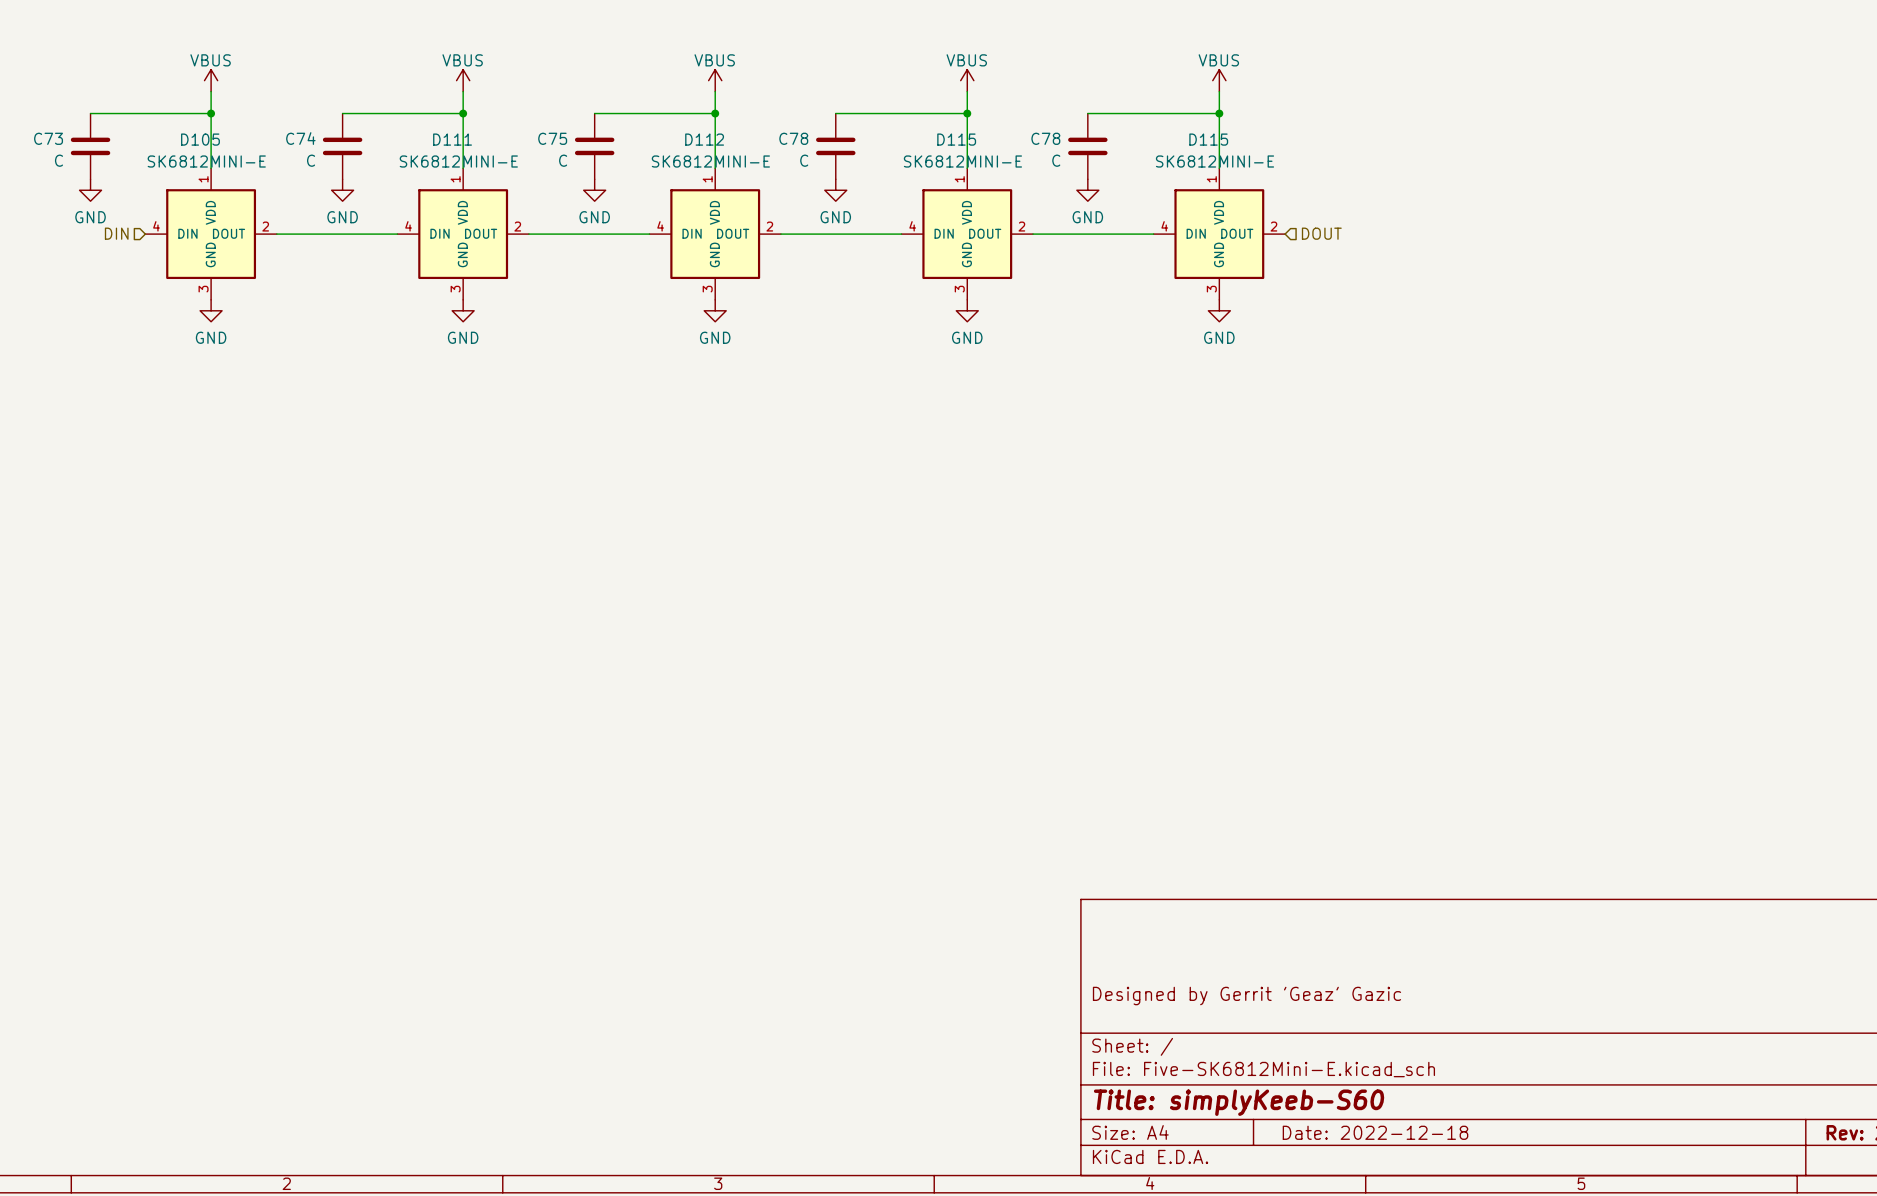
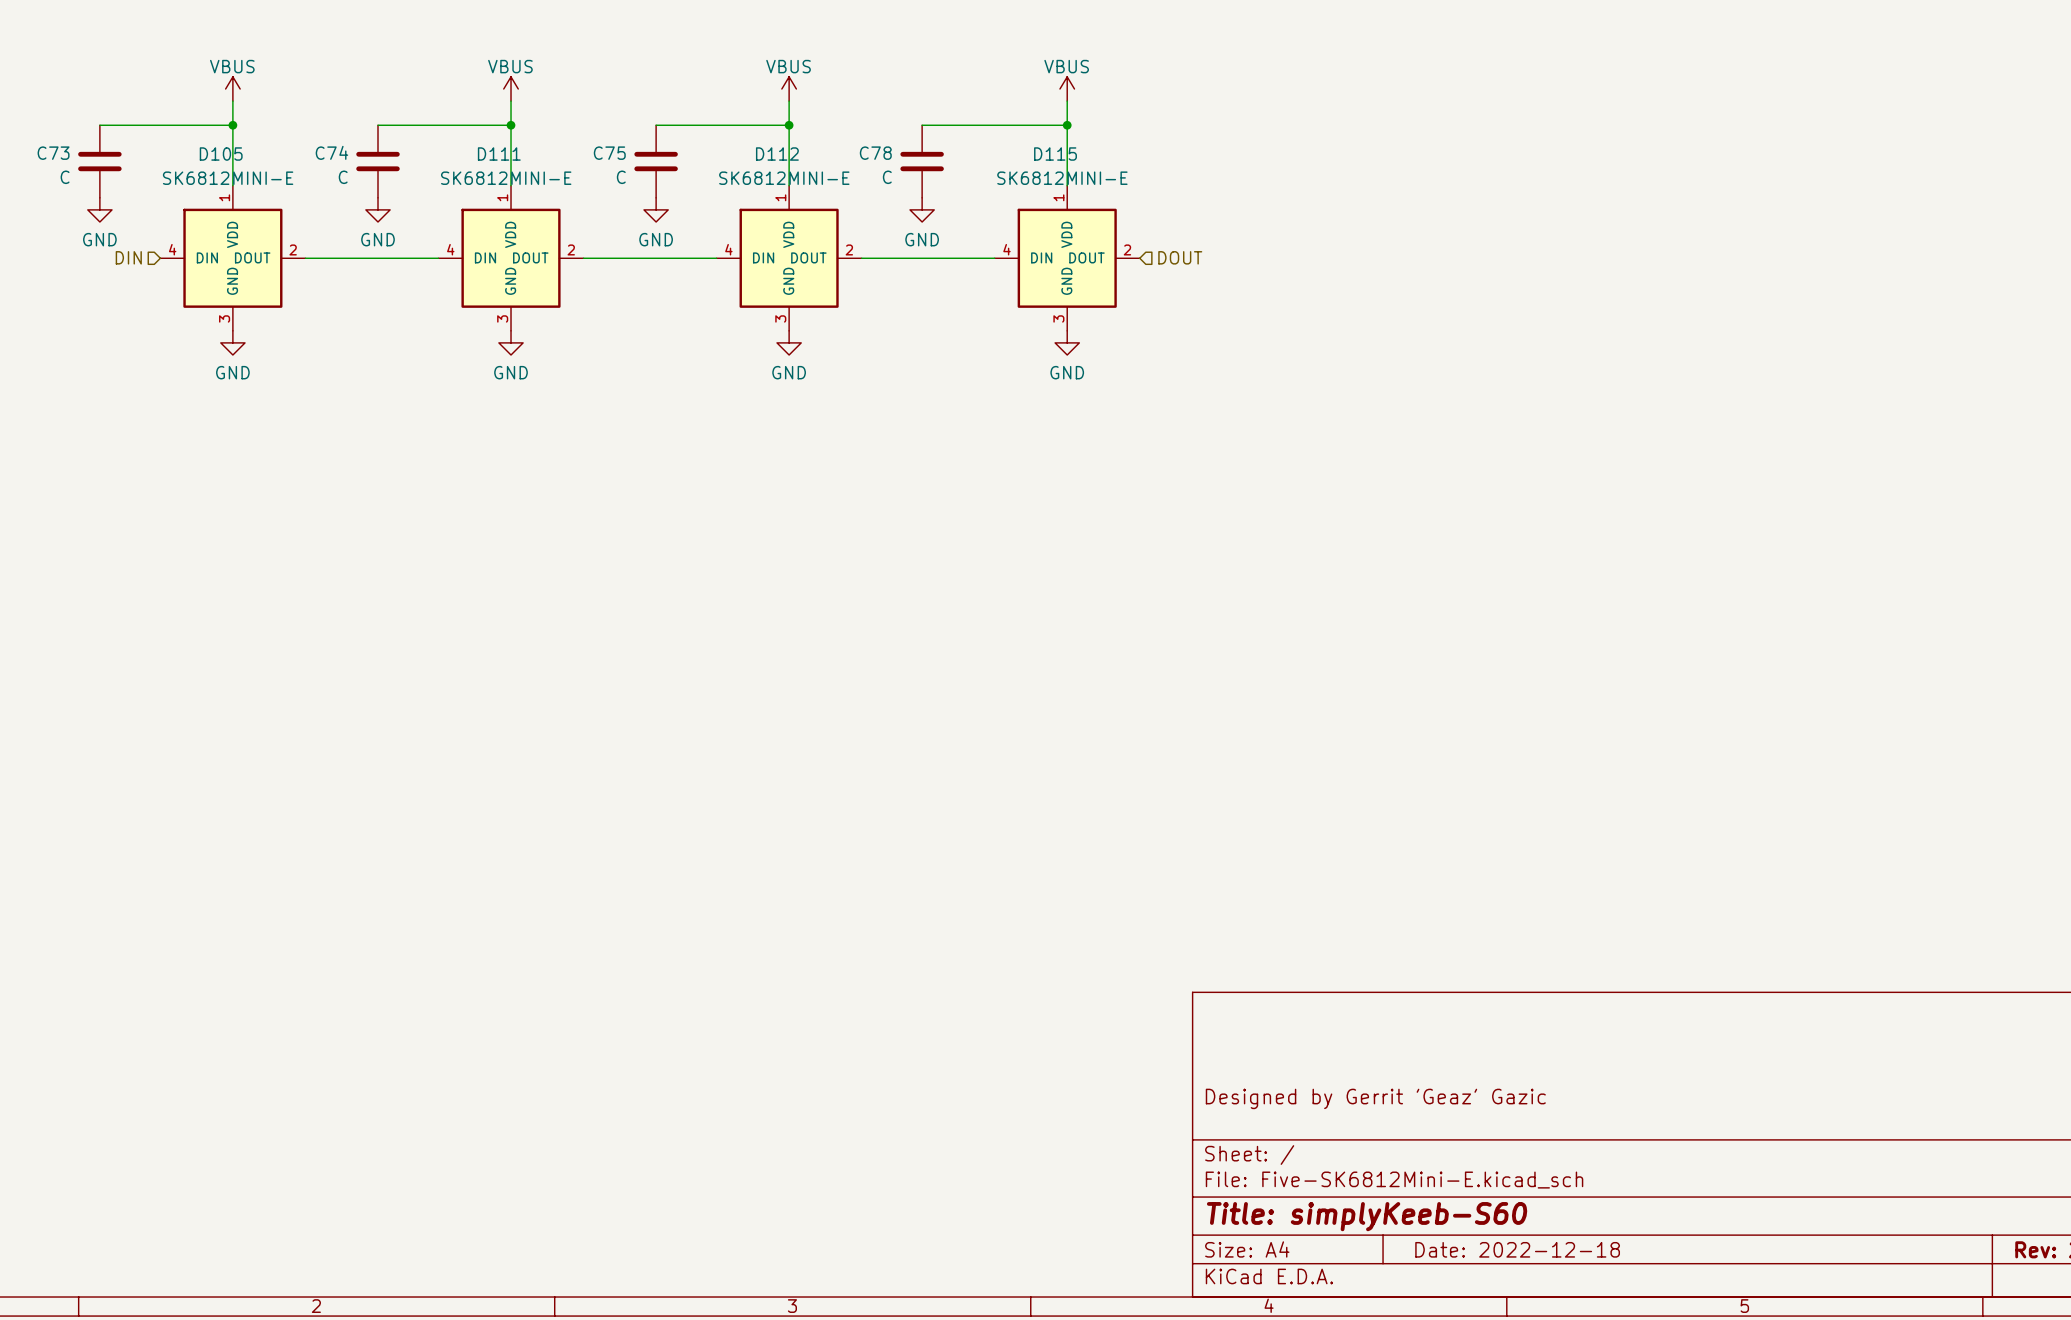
power symbol: VBUS (1219, 80) -> none
wire: (1219, 91) (1219, 168) -> none
wire: (1087, 113) (1219, 113) -> none
junction: (1219, 113) -> none
C78: C (1087, 146) -> none
power symbol: GND (1087, 190) -> none
hierarchical label: none -> DOUT (1180, 257)
hierarchical label: DOUT (1321, 233) -> none
wire: (1033, 234) (1153, 234) -> none
D115: SK6812MINI-E (1219, 234) -> none
power symbol: GND (1219, 310) -> none

